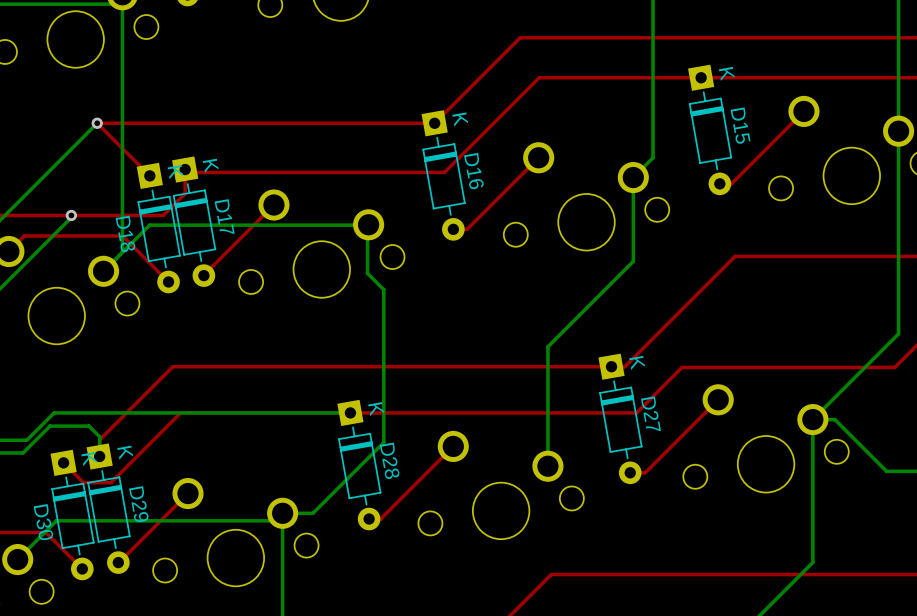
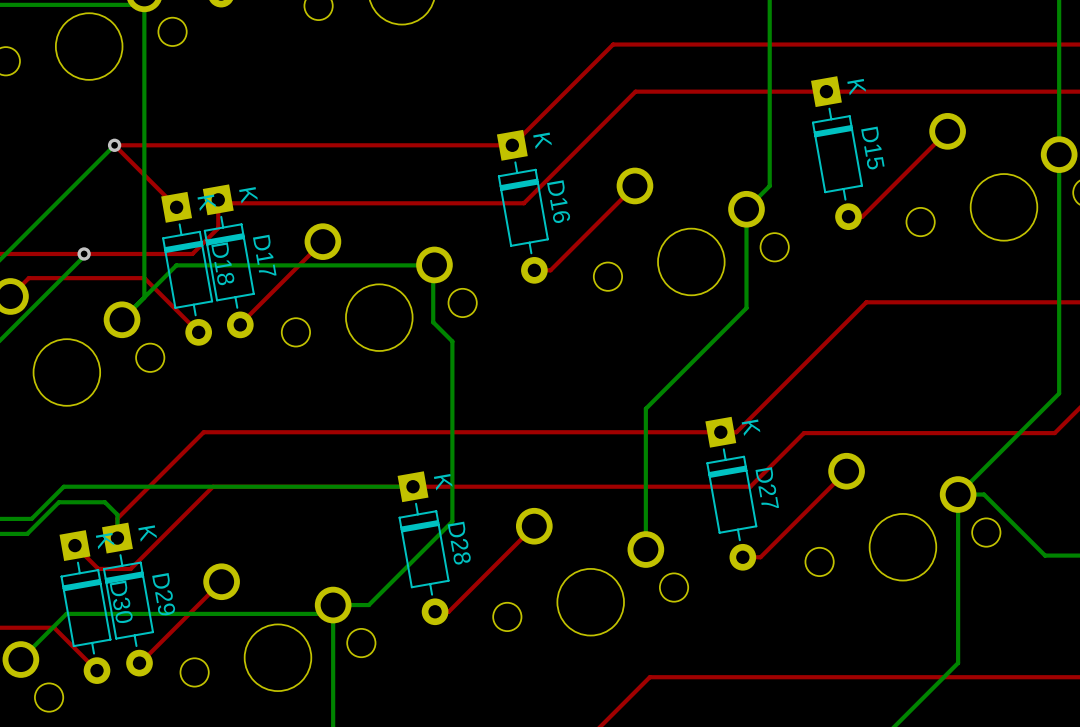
D18 name position: D18 (125, 233) -> D18 (222, 263)
D30 name position: D30 (43, 522) -> D30 (121, 602)

